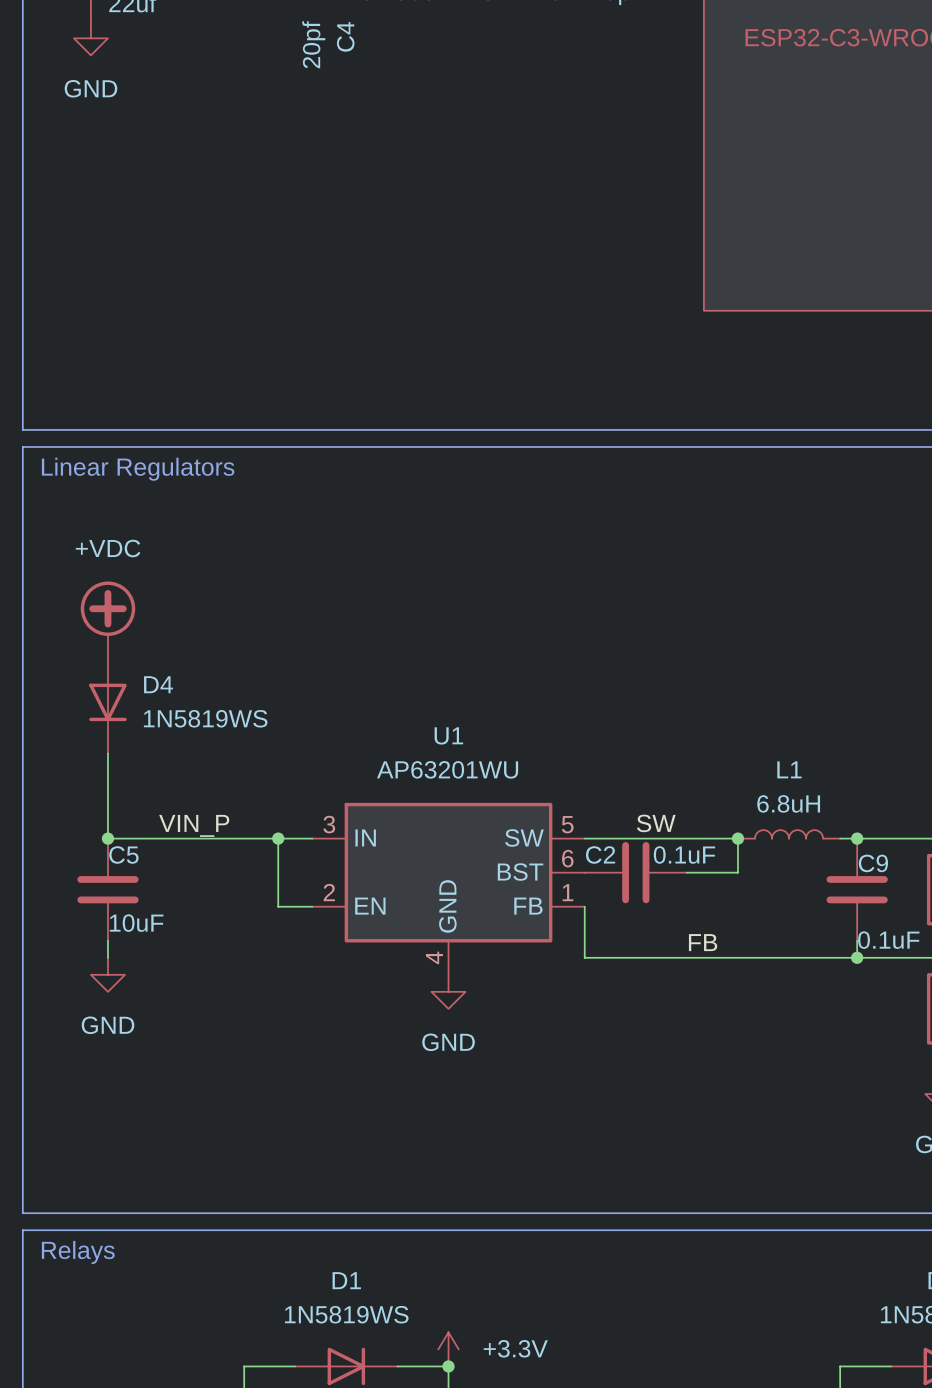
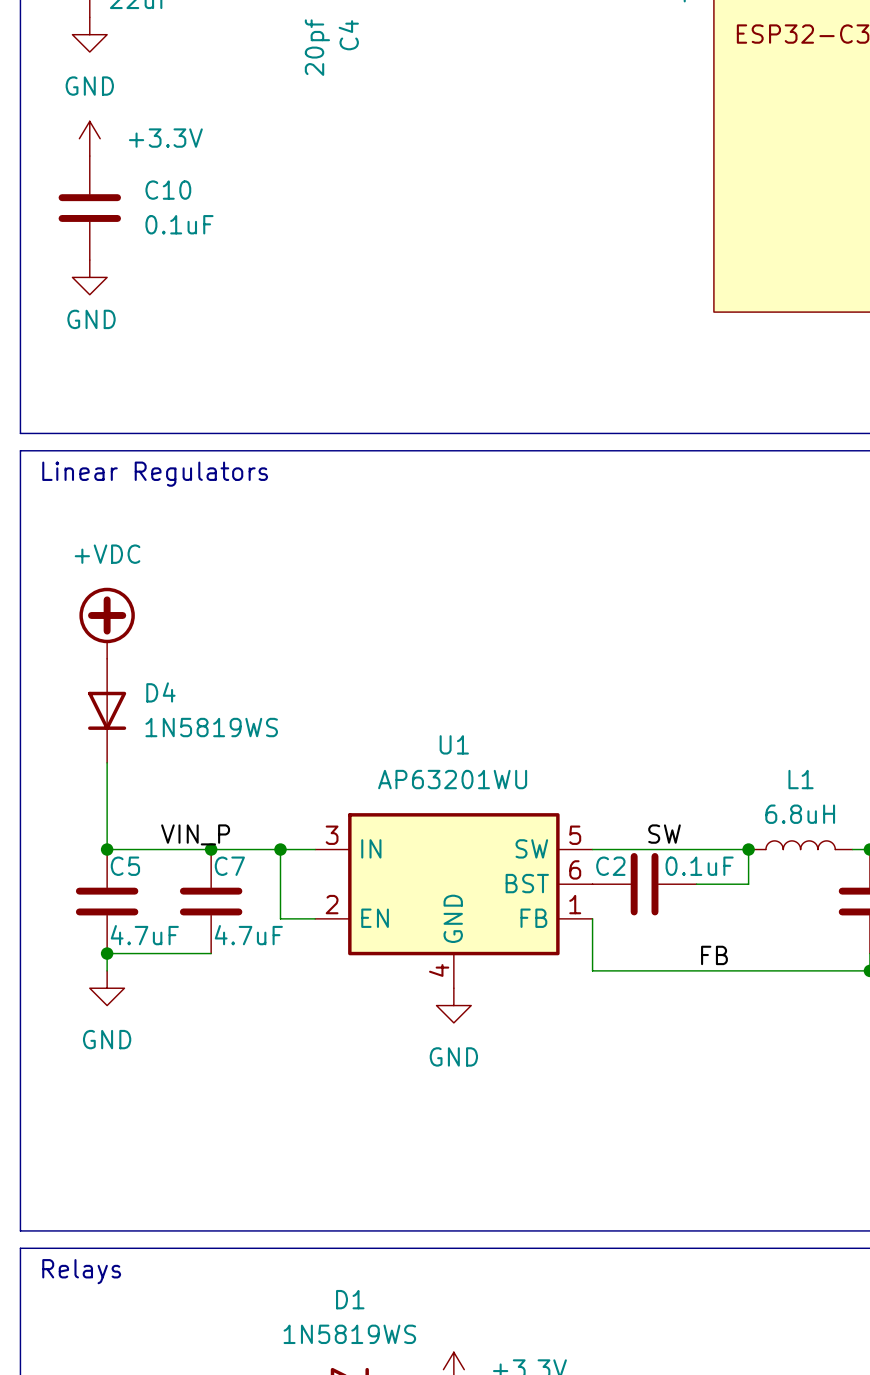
power symbol: none -> +3.3V (89, 138)
C10: none -> 0.1uF (89, 208)
power symbol: none -> GND (89, 277)
junction: none -> (211, 849)
C7: none -> 4.7uF (211, 901)
C5 value: 10uF (136, 923) -> 4.7uF (144, 935)
wire: none -> (107, 953) (211, 953)
junction: none -> (107, 953)

